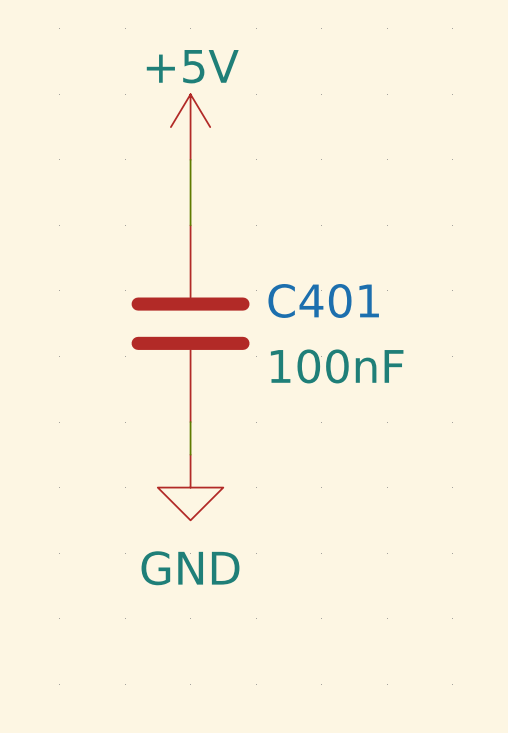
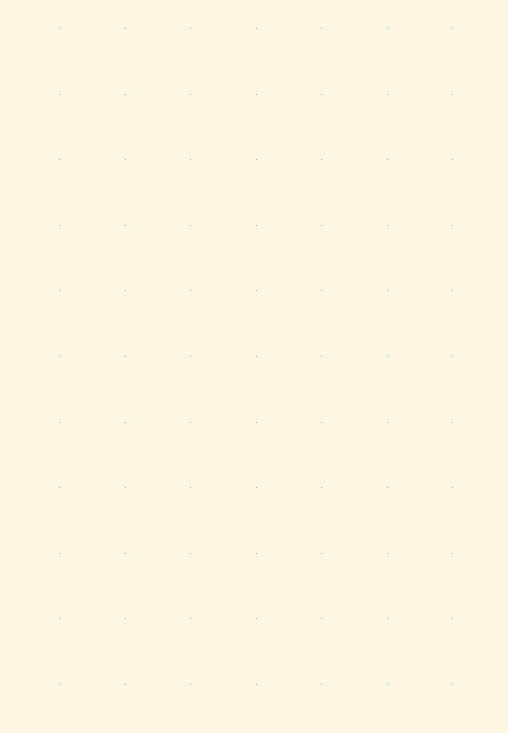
power symbol: +5V (190, 127) -> none
wire: (190, 159) (190, 225) -> none
C401: 100nF (190, 323) -> none
wire: (190, 422) (190, 454) -> none
power symbol: GND (190, 487) -> none

